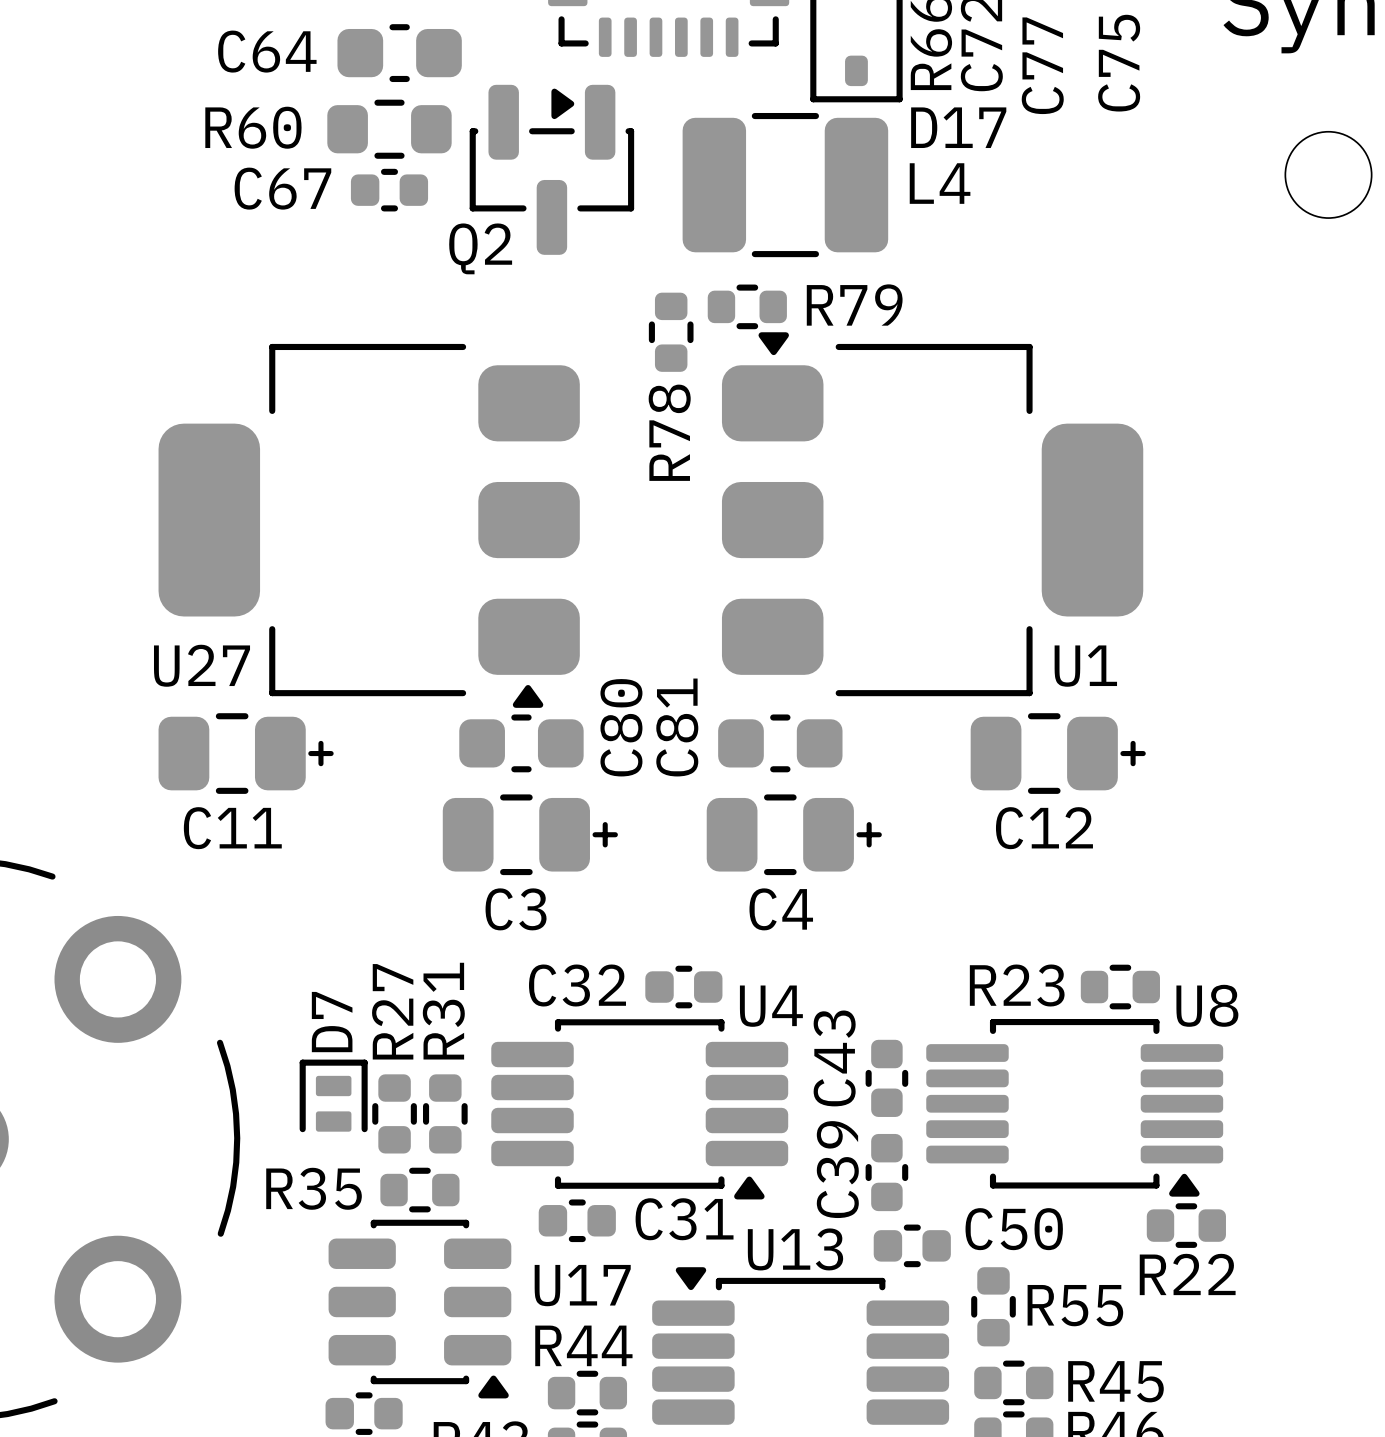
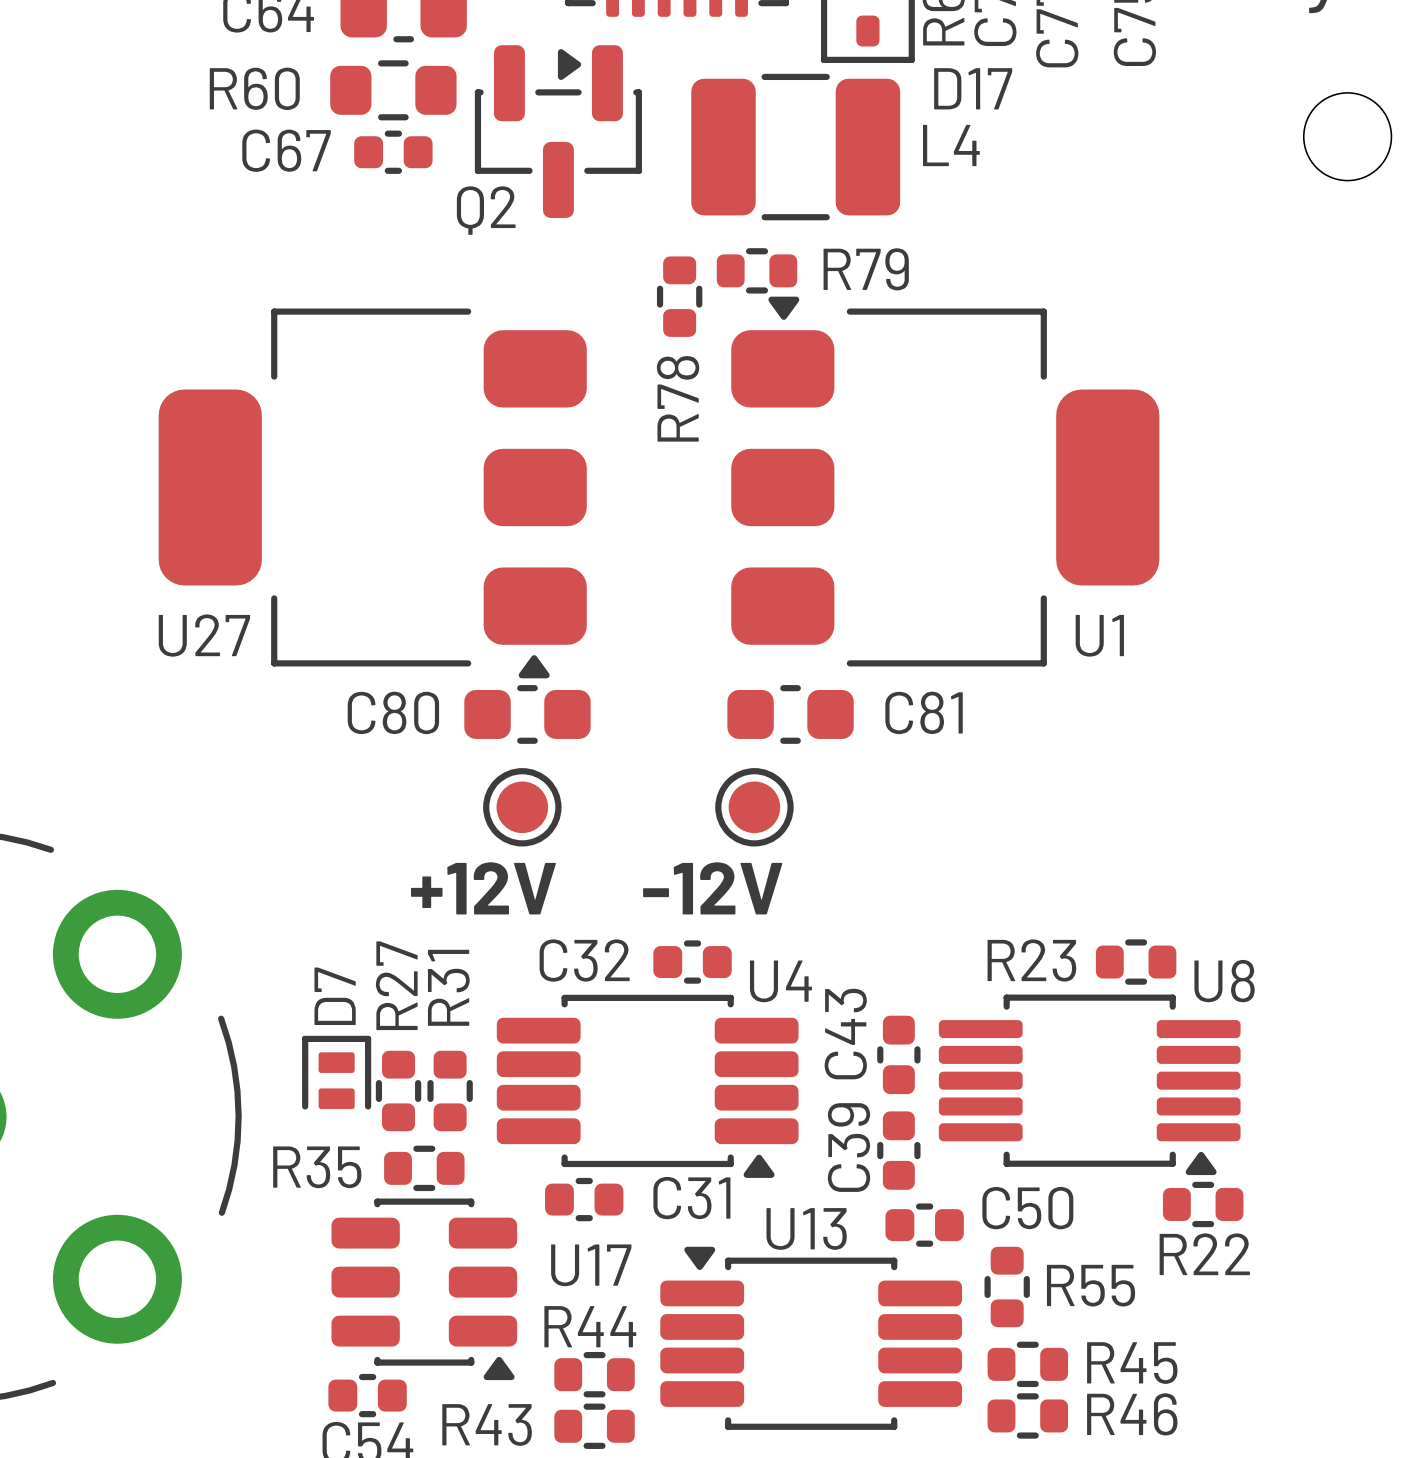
C80 name rotation: 0° (621, 727) -> 90° clockwise (393, 712)
C80 name position: C80 (621, 727) -> C80 (393, 712)
C81 name rotation: 0° (677, 727) -> 90° clockwise (924, 712)
C81 name position: C81 (677, 727) -> C81 (924, 712)
C11: (246, 753) -> none
C12: (1058, 753) -> none
part: none -> (522, 807)
C3: (530, 834) -> none
part: none -> (754, 807)
C4: (794, 834) -> none
text: none -> +12V (483, 888)
text: none -> -12V (712, 888)

